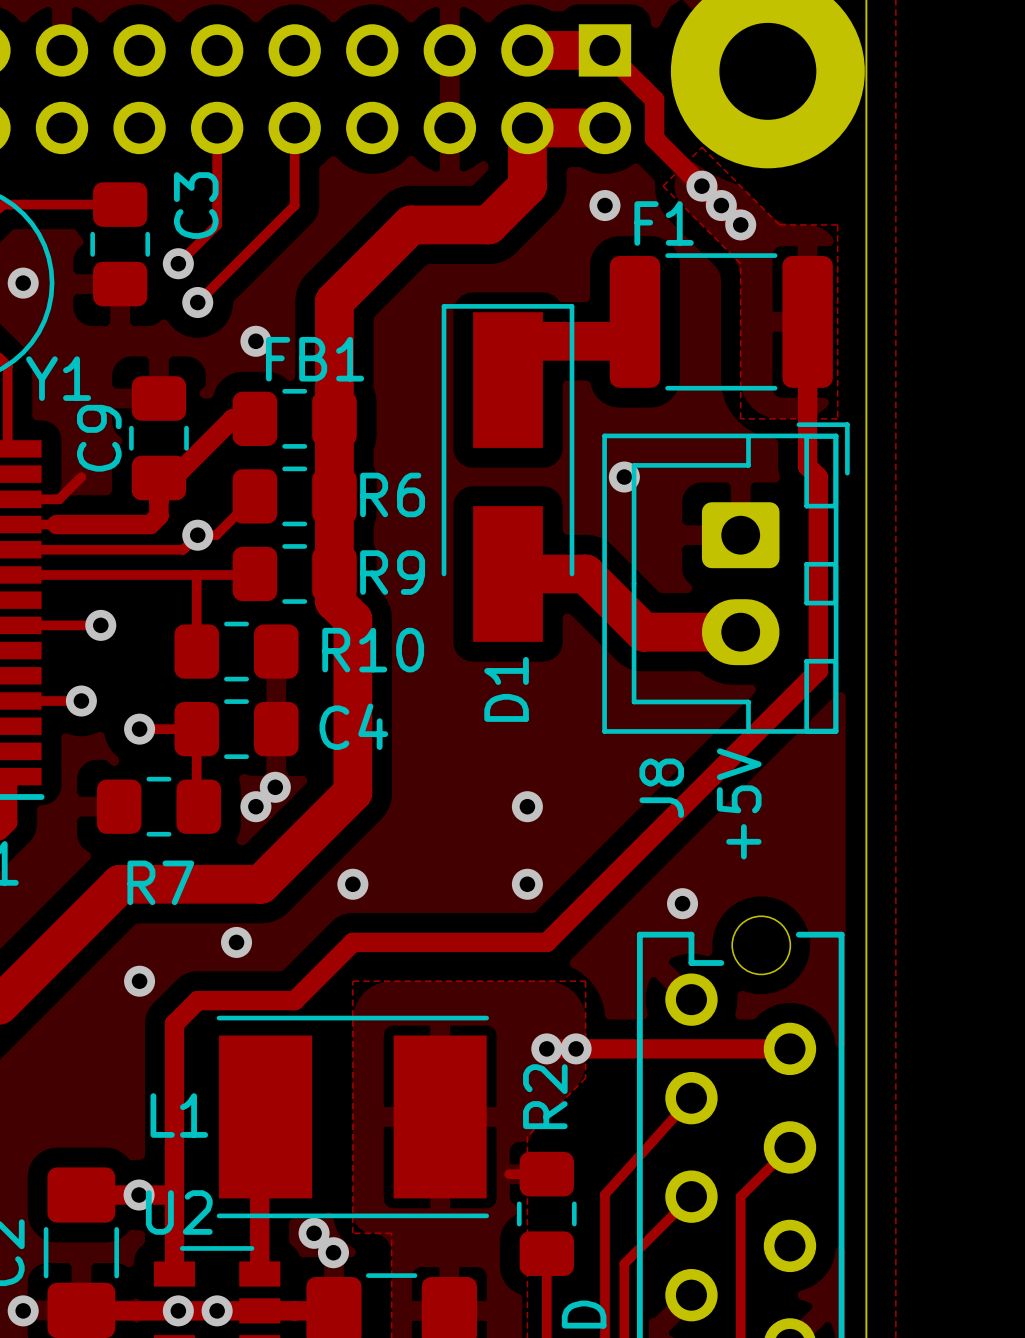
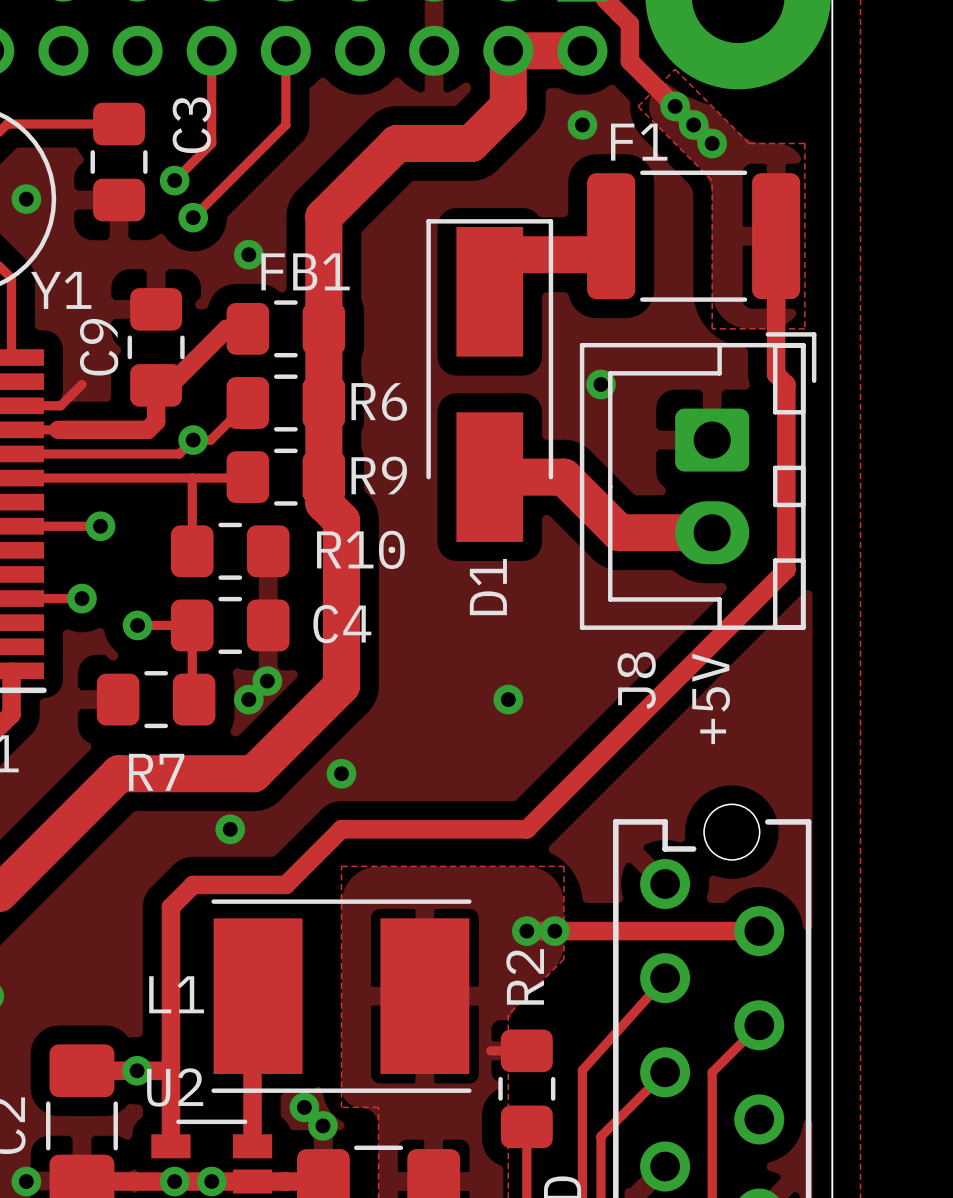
via: (527, 884) -> none
via: (682, 903) -> none
via: (139, 981) -> none

